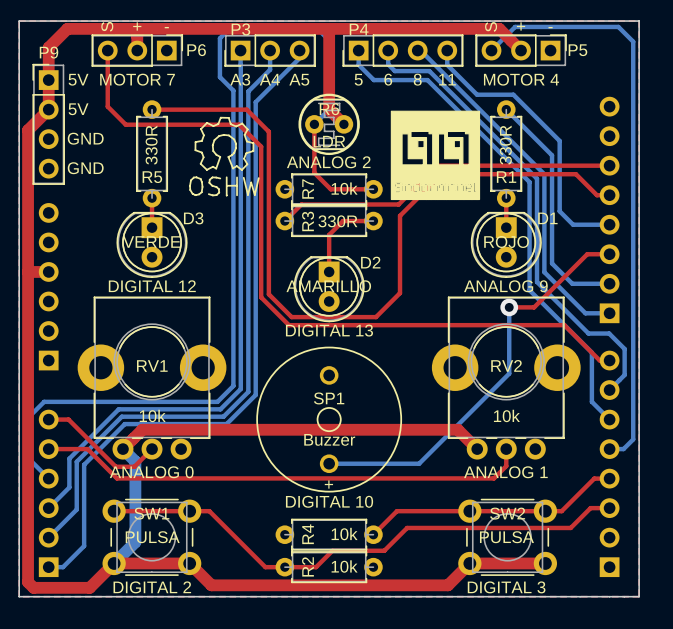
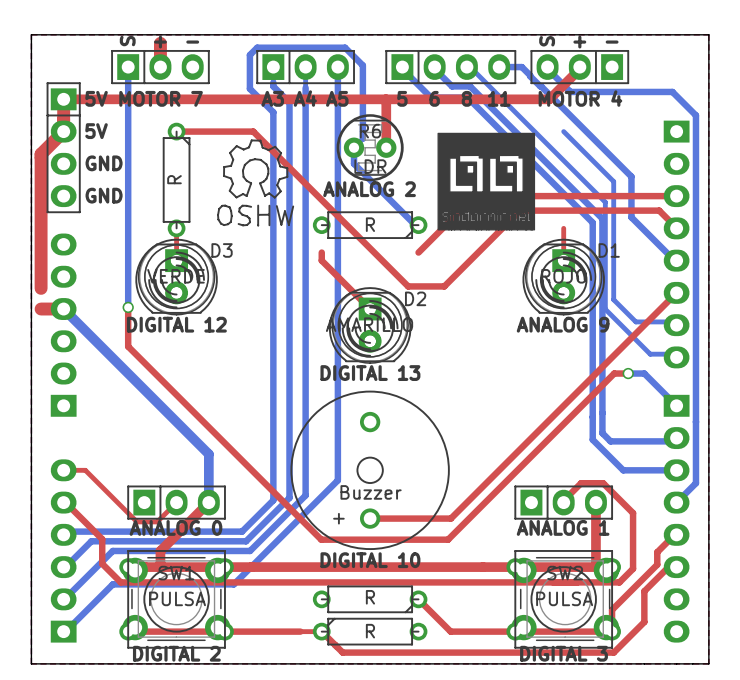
top track: (329, 28) (329, 109) (343, 124) -> (385, 99) (386, 147)
top track: (107, 50) (107, 106) (125, 124) (239, 124) (261, 146) (261, 297) (288, 325) (564, 325) (599, 360) (609, 360) -> none
bottom track: none -> (128, 67) (128, 307)
P6: (137, 50) -> none
part: none -> (160, 67)
P3: (270, 50) -> none
part: none -> (305, 67)
P4: (402, 50) -> none
part: none -> (450, 67)
bottom track: (447, 50) (447, 64) (477, 94) (513, 94) (559, 140) (559, 211) (573, 224) (609, 224) -> (499, 67) (521, 67) (631, 176) (631, 217) (676, 260)
bottom track: (491, 50) (515, 26) (618, 26) (633, 41) (633, 439) (623, 449) (609, 449) -> (547, 67) (570, 91) (672, 91) (695, 115) (695, 483) (676, 502)
top track: (521, 50) (499, 28) (67, 28) (48, 47) (48, 80) -> (579, 65) (579, 69) (549, 99) (63, 99)
P5: (521, 50) -> none
part: none -> (579, 67)
bottom track: (358, 52) (358, 64) (373, 80) (427, 80) (529, 182) (529, 290) (591, 352) (591, 401) (609, 419) -> (402, 69) (431, 97) (467, 97) (592, 222) (592, 439) (623, 470) (676, 470)
bottom track: (388, 52) (388, 64) (394, 71) (429, 71) (537, 178) (537, 281) (588, 333) (609, 333) (624, 349) (624, 375) (609, 390) -> (434, 69) (452, 86) (470, 86) (602, 218) (602, 433) (610, 441) (671, 441) (676, 438)
bottom track: (299, 58) (255, 102) (255, 394) (226, 424) (124, 424) (84, 464) (84, 546) (63, 567) (50, 567) -> (337, 75) (337, 480) (233, 584) (112, 584) (65, 631)
bottom track: (240, 64) (240, 389) (220, 409) (118, 409) (69, 458) (69, 487) (48, 508) -> (273, 82) (273, 86) (289, 102) (289, 497) (246, 541) (91, 541) (63, 567)
bottom track: (270, 69) (248, 91) (248, 391) (223, 416) (121, 416) (76, 461) (76, 509) (48, 537) -> (305, 87) (305, 495) (250, 550) (112, 550) (63, 599)
part footprint: [599, 96, 620, 324] -> [663, 120, 690, 369]
top track: (152, 109) (246, 109) (268, 131) (268, 294) (291, 317) (376, 317) (400, 293) (400, 215) (441, 174) (575, 174) (596, 195) (609, 195) -> (176, 131) (253, 131) (408, 286) (444, 286) (520, 210) (659, 210) (678, 228)
bottom track: (322, 116) (326, 111) (326, 38) (315, 26) (231, 26) (219, 38) (219, 77) (233, 90) (233, 385) (217, 401) (44, 401) (30, 415) (30, 460) (48, 478) -> (362, 138) (362, 65) (345, 47) (257, 47) (249, 55) (249, 88) (273, 112) (273, 500) (242, 531) (66, 531) (63, 534)
P9: (48, 124) -> none
part: none -> (63, 147)
top track: (314, 124) (314, 172) (330, 189) (373, 189) -> none
bottom track: none -> (354, 147) (354, 163) (418, 228)
R5: 330R (152, 153) -> none
part: none -> R (176, 179)
R1: 330R (506, 153) -> none
top track: (609, 165) (437, 165) (398, 204) (301, 204) (284, 221) -> none
top track: none -> (676, 196) (474, 196) (418, 252)
R7: 10k (329, 189) -> none
part: none -> R (370, 225)
part footprint: [38, 203, 59, 371] -> [50, 233, 77, 417]
R3: 330R (329, 221) -> none
top track: (373, 221) (343, 221) (329, 234) (329, 271) -> (321, 252) (321, 260) (370, 309)
part: none -> (176, 276)
part: none -> (563, 276)
top track: (28, 253) (28, 582) (33, 587) (89, 587) (114, 563) (189, 563) (211, 585) (448, 585) (469, 563) (545, 563) -> none
top track: (609, 254) (587, 254) (534, 307) (509, 307) -> none
top track: none -> (678, 292) (450, 518) (370, 518)
top track: none -> (128, 307) (128, 346) (321, 539) (448, 539) (614, 373) (628, 373)
via: none -> (128, 307)
bottom track: none -> (65, 309) (63, 309) (208, 454) (208, 502)
part: none -> (370, 324)
bottom track: (509, 307) (509, 373) (419, 463) (329, 463) -> none
via: (509, 307) -> none
bottom track: none -> (628, 373) (644, 373) (676, 405)
via: none -> (628, 373)
part footprint: [599, 350, 620, 578] -> [663, 394, 690, 643]
RV1: 10k (152, 378) -> none
RV2: 10k (506, 378) -> none
SP1 name: SP1 (329, 398) -> none
part footprint: [38, 409, 59, 578] -> [50, 459, 77, 643]
top track: (50, 449) (87, 449) (116, 478) (493, 478) (506, 466) (506, 452) -> (65, 502) (102, 539) (102, 563) (120, 582) (619, 582) (633, 568) (633, 513) (603, 483) (581, 483) (563, 502)
top track: (122, 449) (142, 429) (457, 429) (477, 449) -> none
bottom track: (122, 449) (135, 461) (135, 542) (114, 563) -> none
part: none -> (176, 502)
top track: none -> (208, 502) (160, 550) (160, 567)
part: none -> (563, 502)
top track: none -> (595, 502) (595, 564) (598, 567)
top track: (607, 478) (594, 478) (561, 511) (396, 511) (373, 534) -> (674, 534) (657, 552) (657, 564) (612, 609) (612, 631) (450, 631) (418, 599)
SP1 text position: + (328, 484) -> + (338, 518)
top track: none -> (128, 567) (612, 567)
top track: (602, 508) (590, 508) (570, 527) (407, 527) (384, 550) (332, 550) (316, 567) (284, 567) -> (668, 567) (644, 591) (644, 622) (613, 652) (342, 652) (321, 631)
top track: (114, 511) (209, 511) (265, 567) -> (128, 631) (300, 631)
R4: 10k (329, 534) -> none
part: none -> (176, 599)
part: none -> R (370, 599)
part: none -> (563, 599)
R2: 10k (329, 567) -> none
part: none -> R (370, 631)

